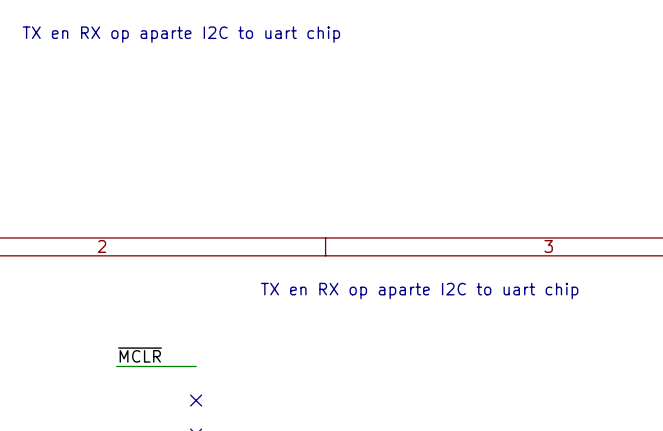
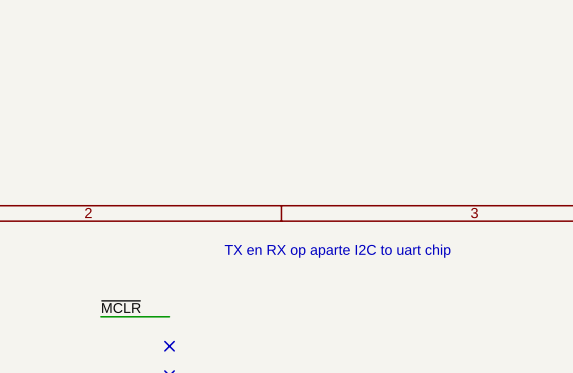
text: TX en RX op aparte I2C to uart chip (181, 34) -> none

